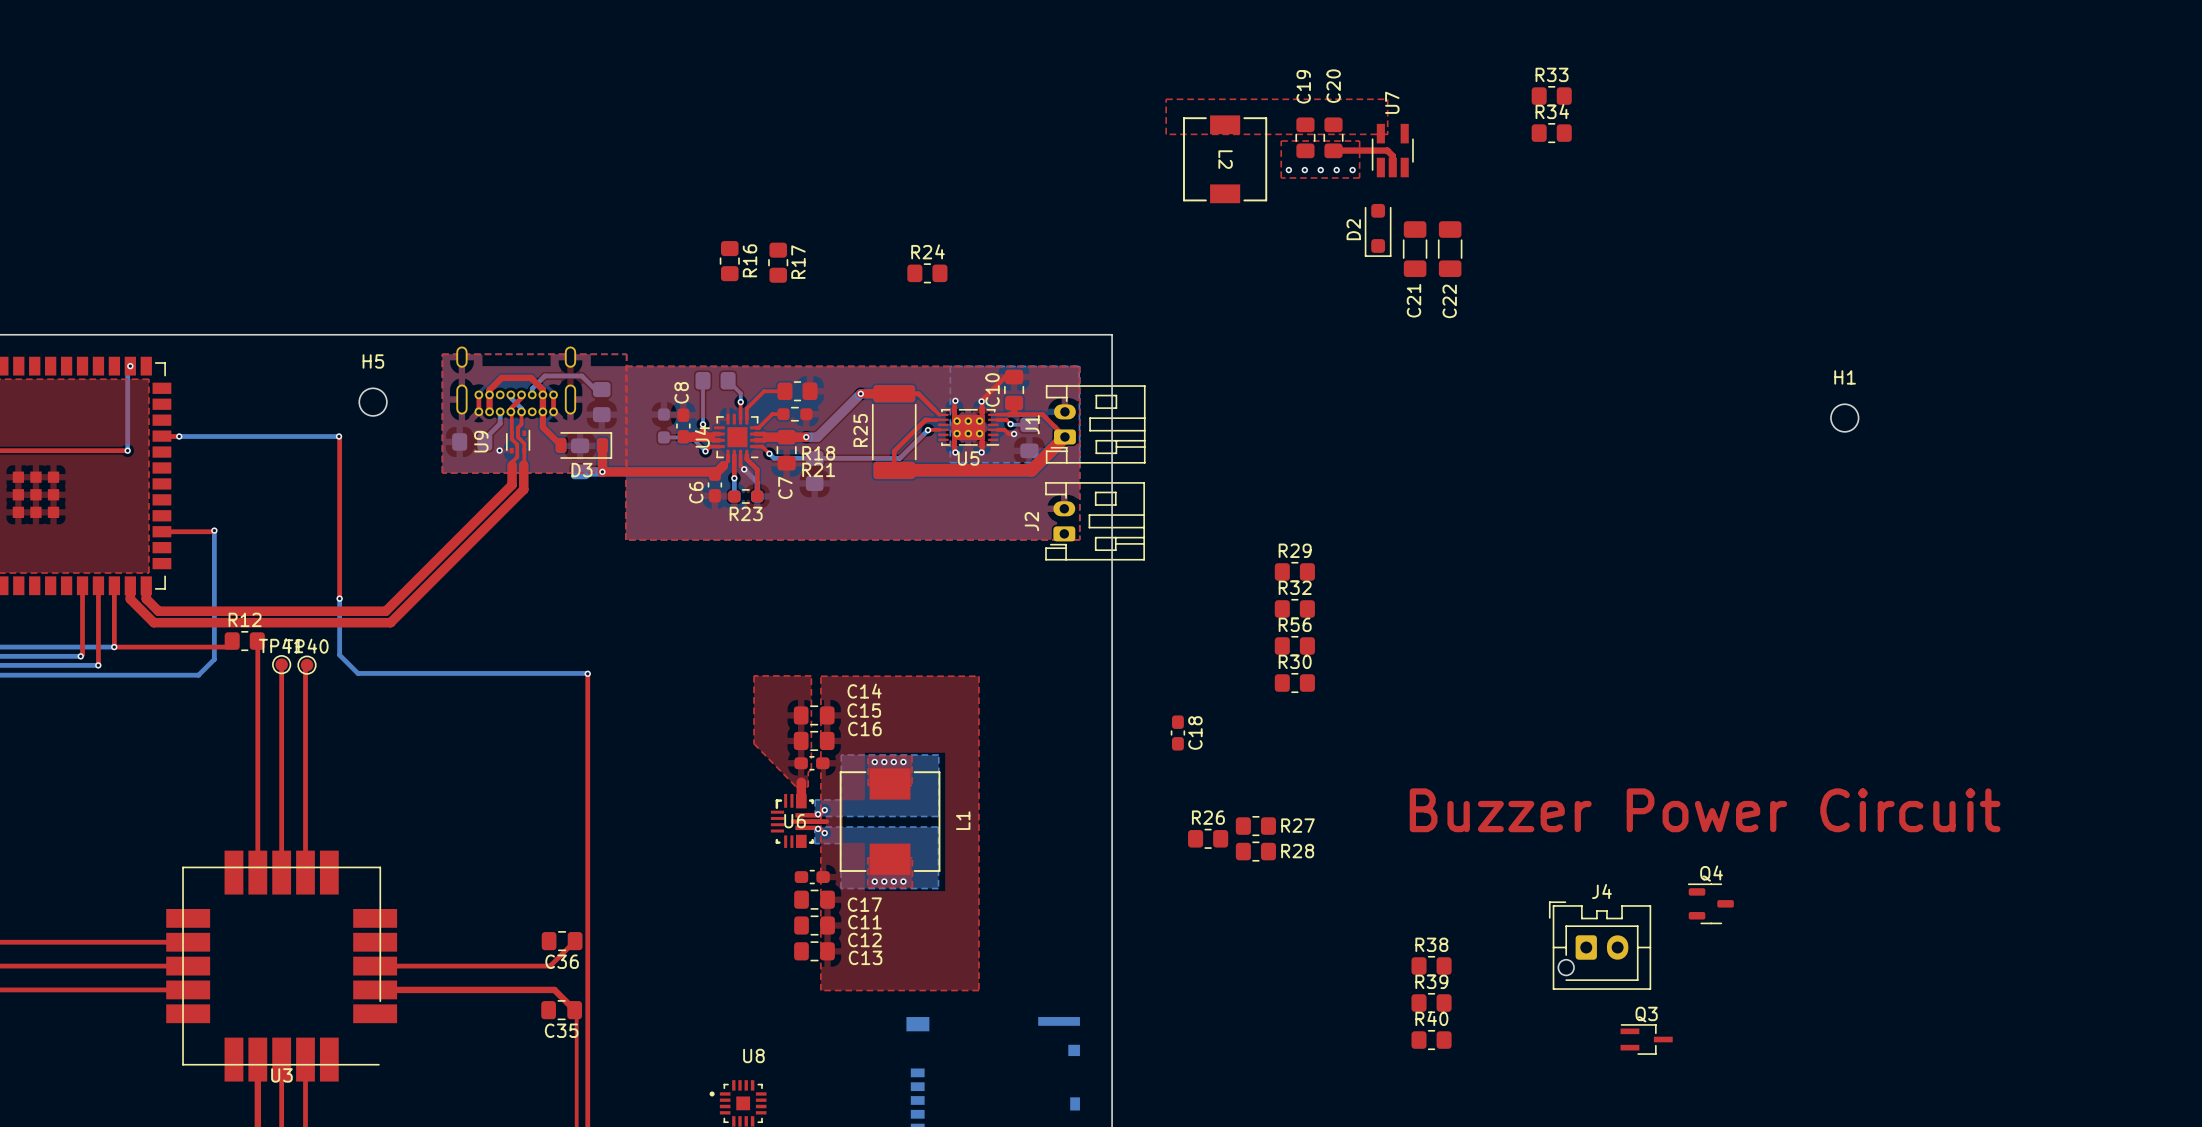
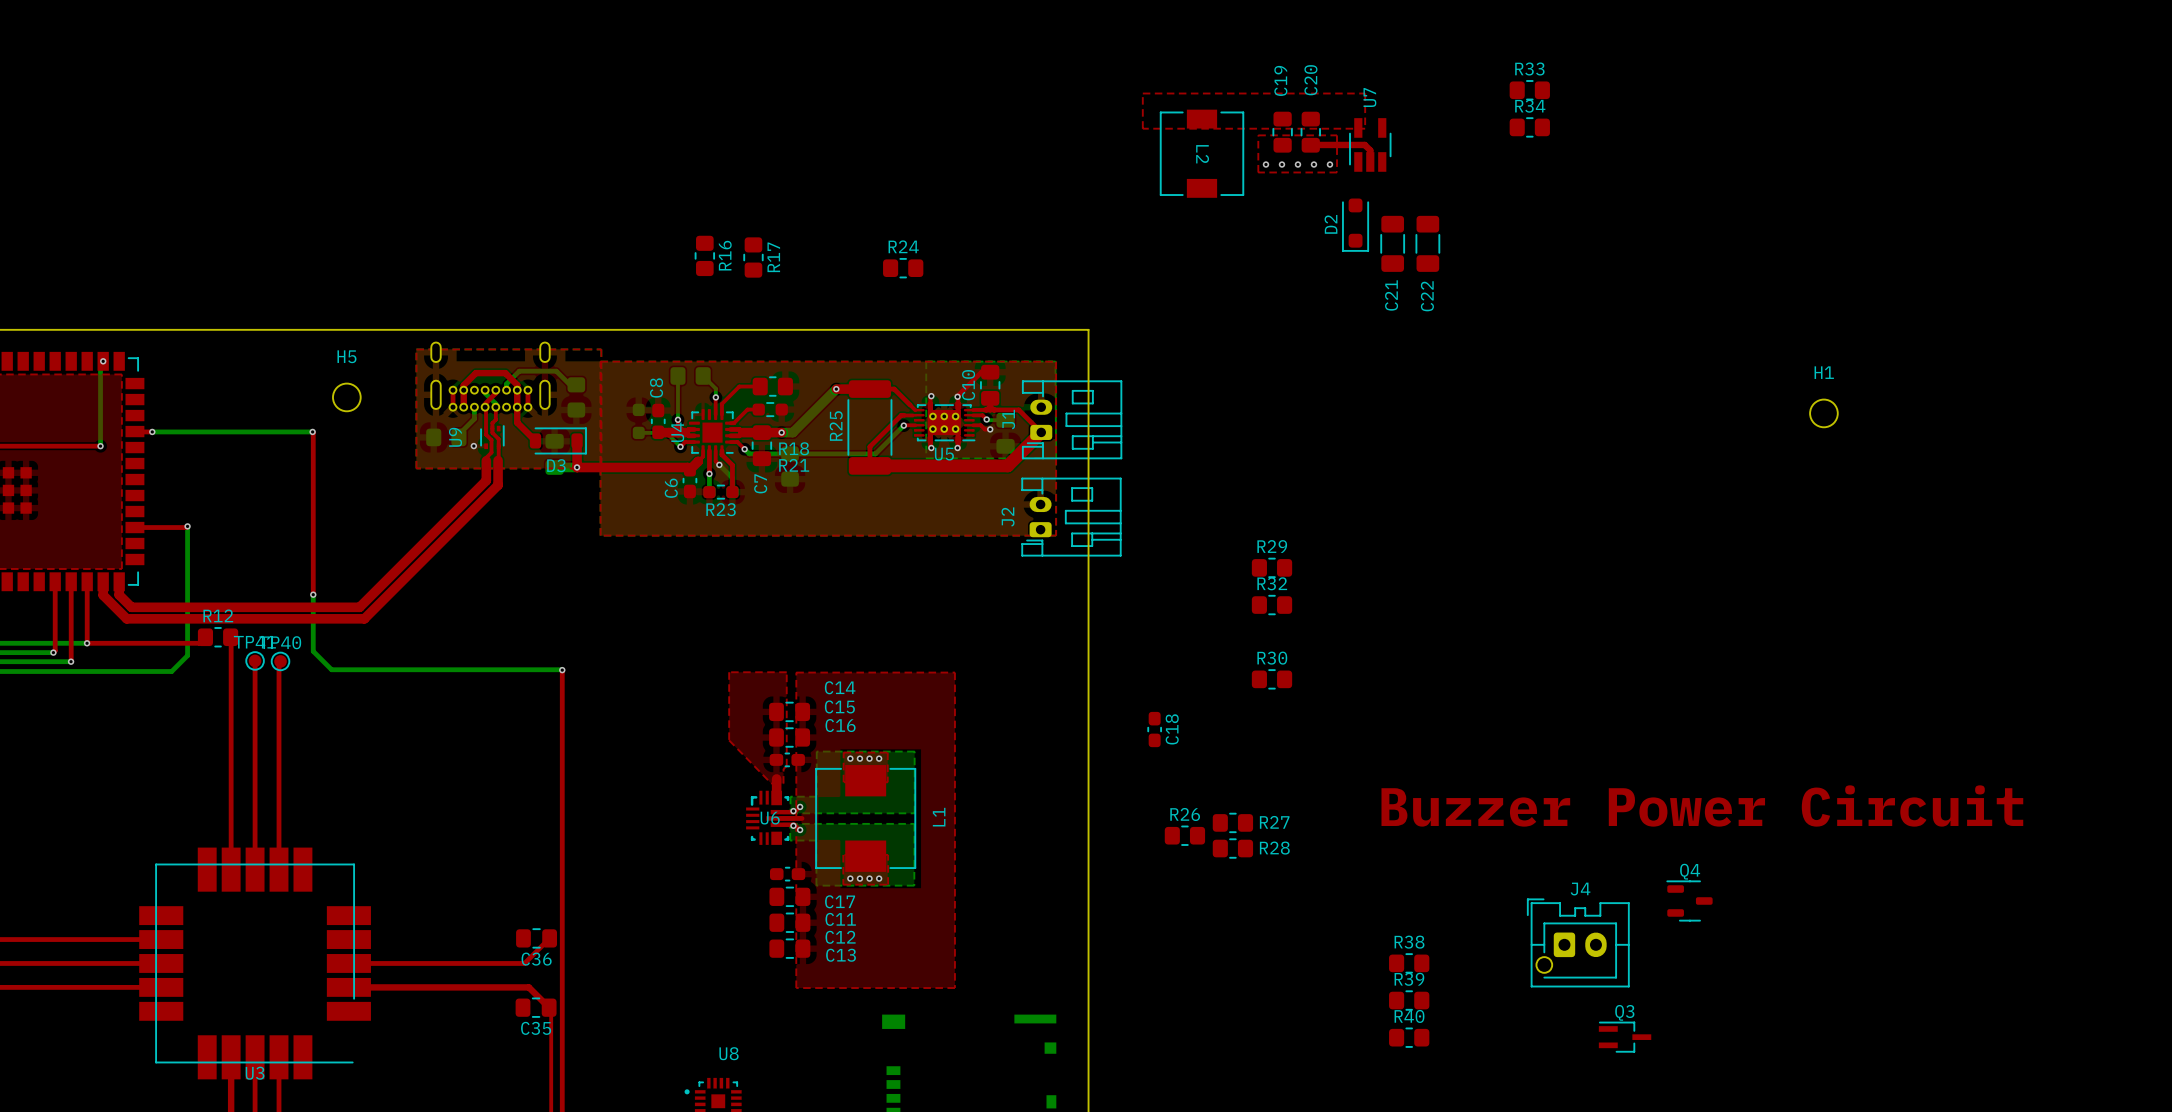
R56: (1294, 645) -> none

